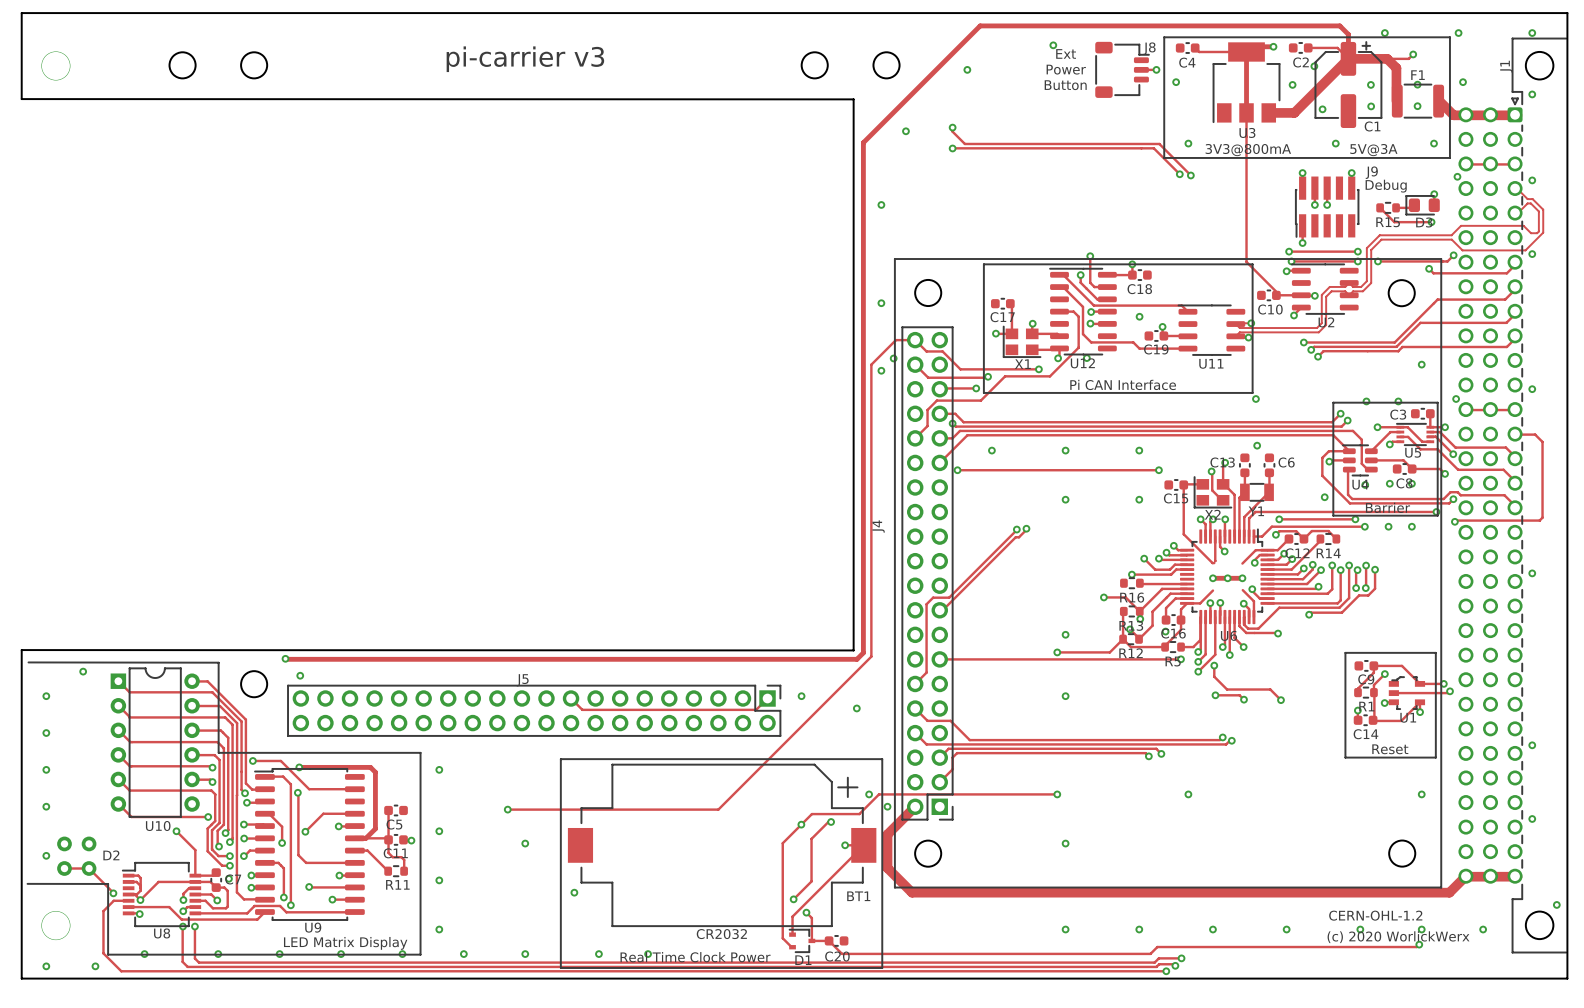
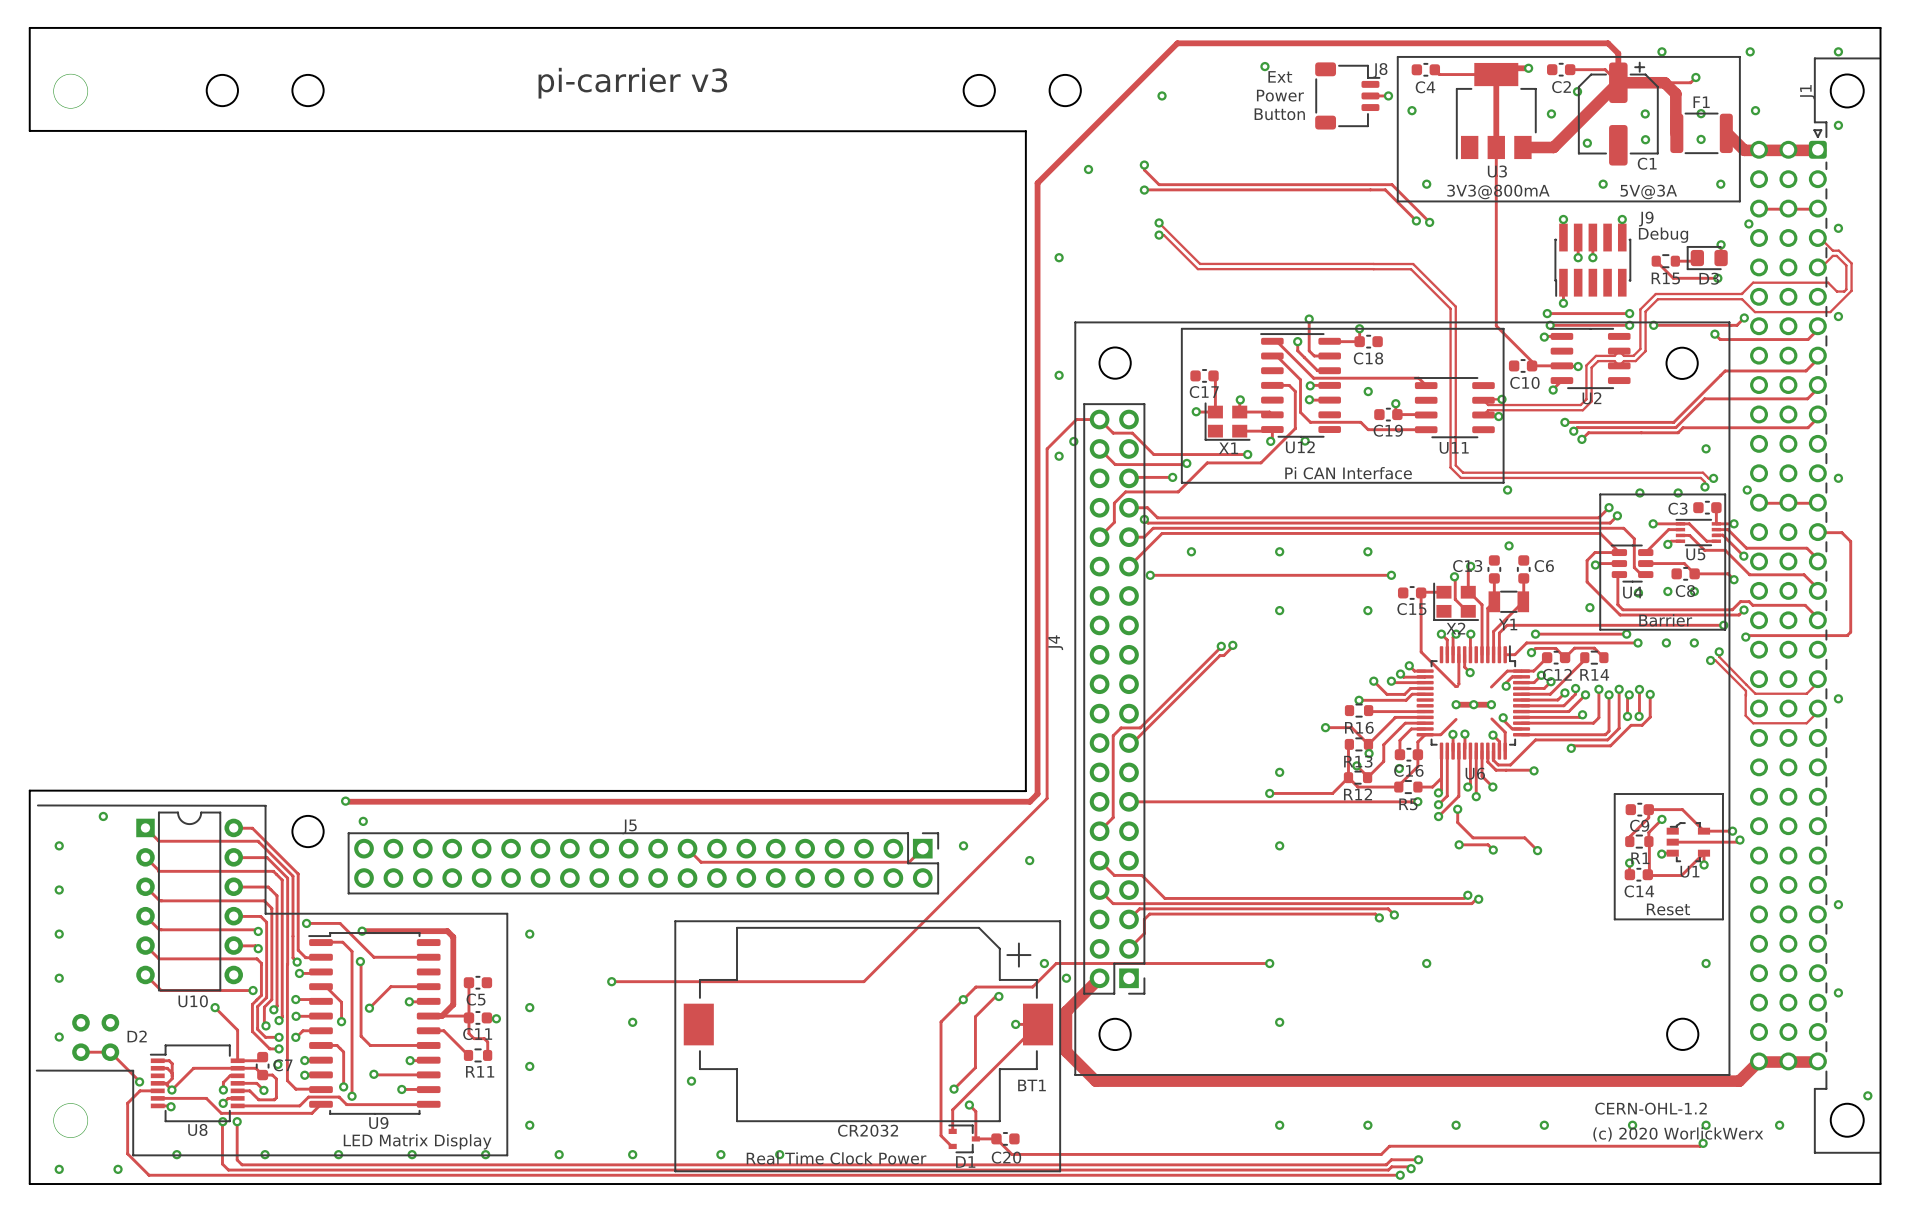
track: none -> (1159, 222) (1200, 263) (1413, 264) (1455, 306) (1455, 465) (1463, 472) (1703, 472) (1708, 478) (1713, 478)
via: none -> (1159, 222)
track: none -> (1159, 235) (1163, 235) (1197, 269) (1373, 269)
via: none -> (1159, 235)
track: none -> (1373, 269) (1411, 269) (1450, 308) (1450, 467) (1460, 477) (1700, 477) (1704, 482) (1704, 486)
via: none -> (1713, 478)
via: none -> (1704, 486)
track: none -> (1719, 651) (1719, 656) (1755, 693) (1806, 693) (1820, 679)
via: none -> (1719, 651)
track: none -> (1710, 660) (1715, 660) (1745, 690) (1745, 695)
via: none -> (1710, 660)
track: none -> (1745, 694) (1745, 715) (1753, 723) (1806, 723) (1820, 709)

